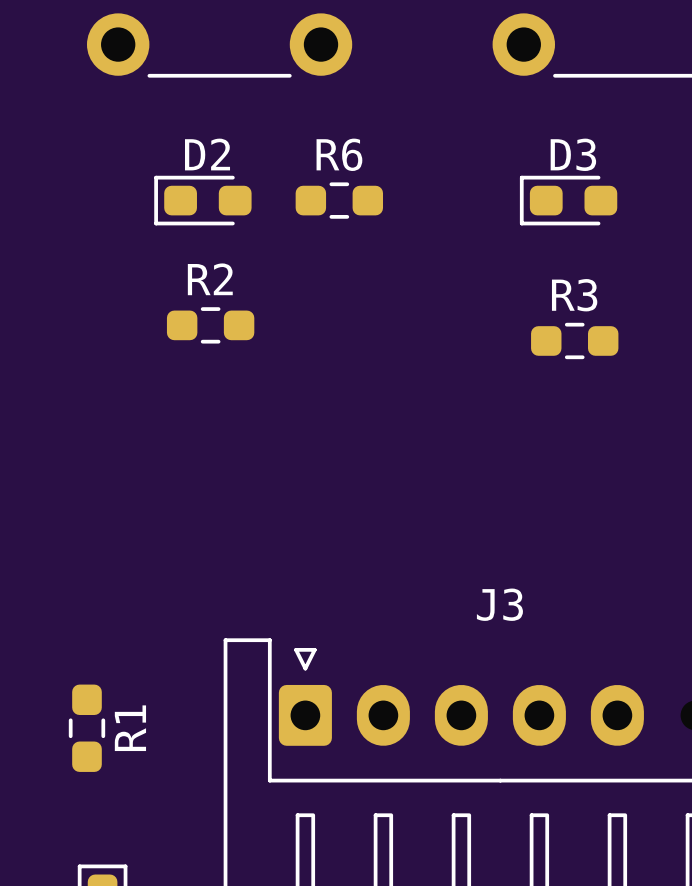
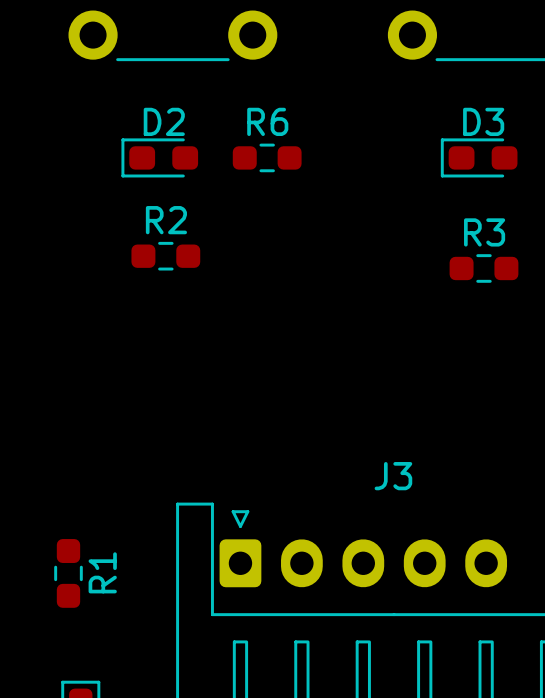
D3 position: (568, 200) -> (479, 157)
R3 position: (574, 340) -> (483, 268)

